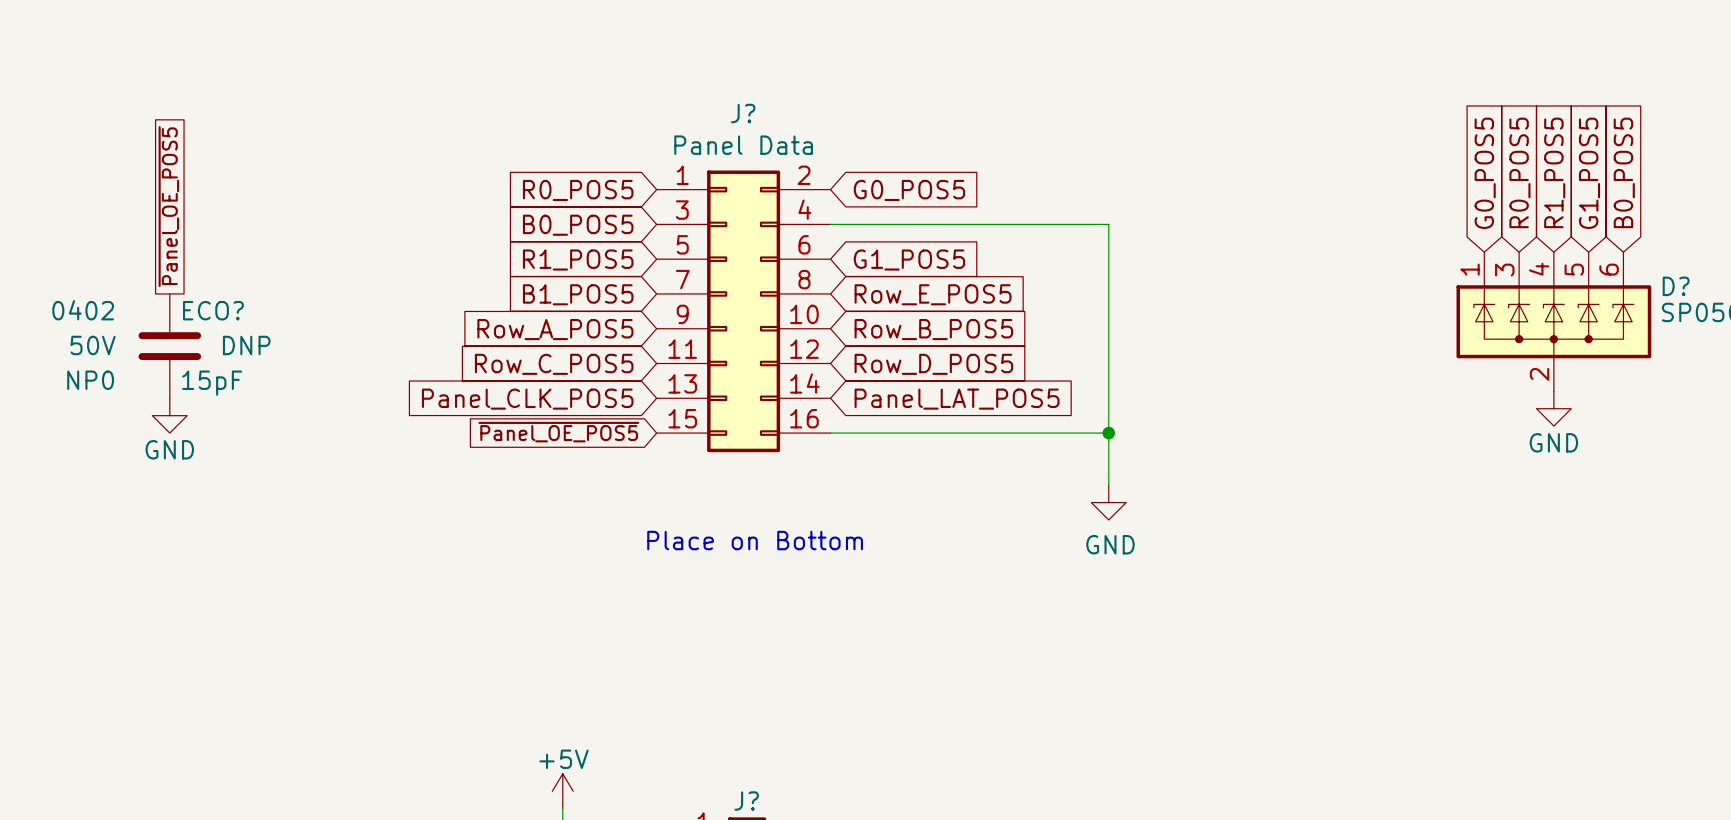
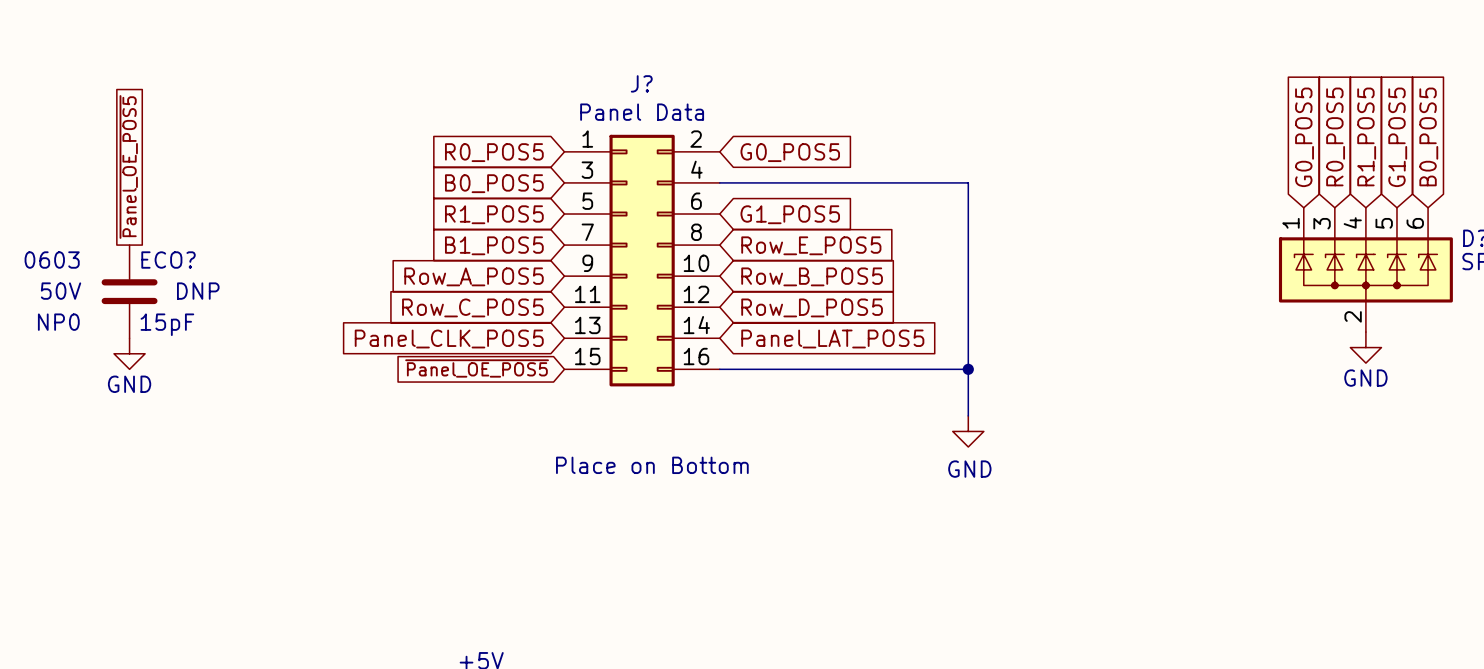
ECO? text: 0402 (83, 310) -> 0603 (52, 260)

